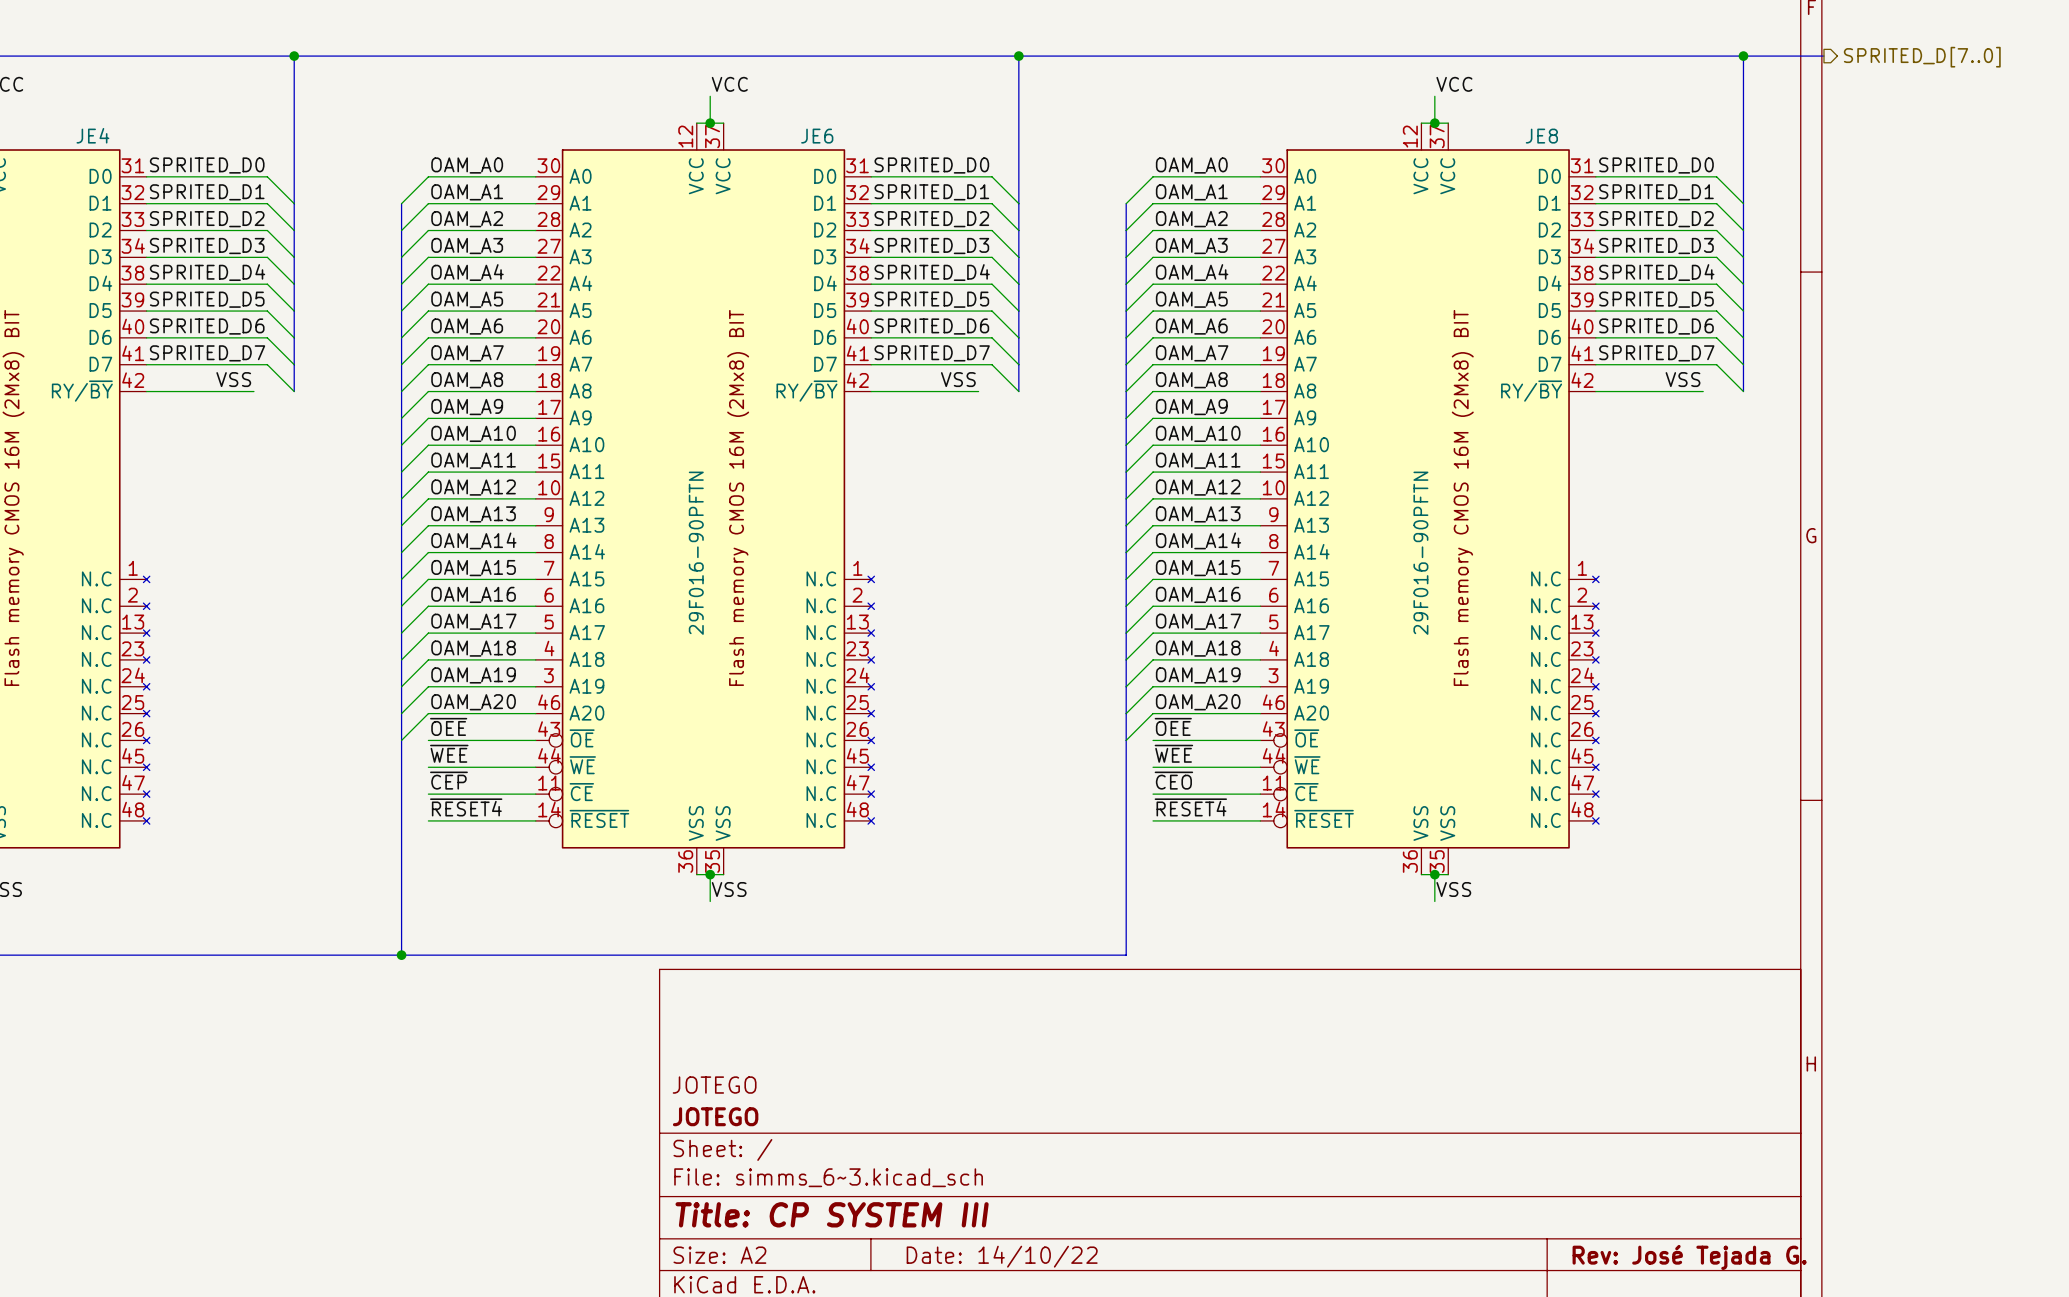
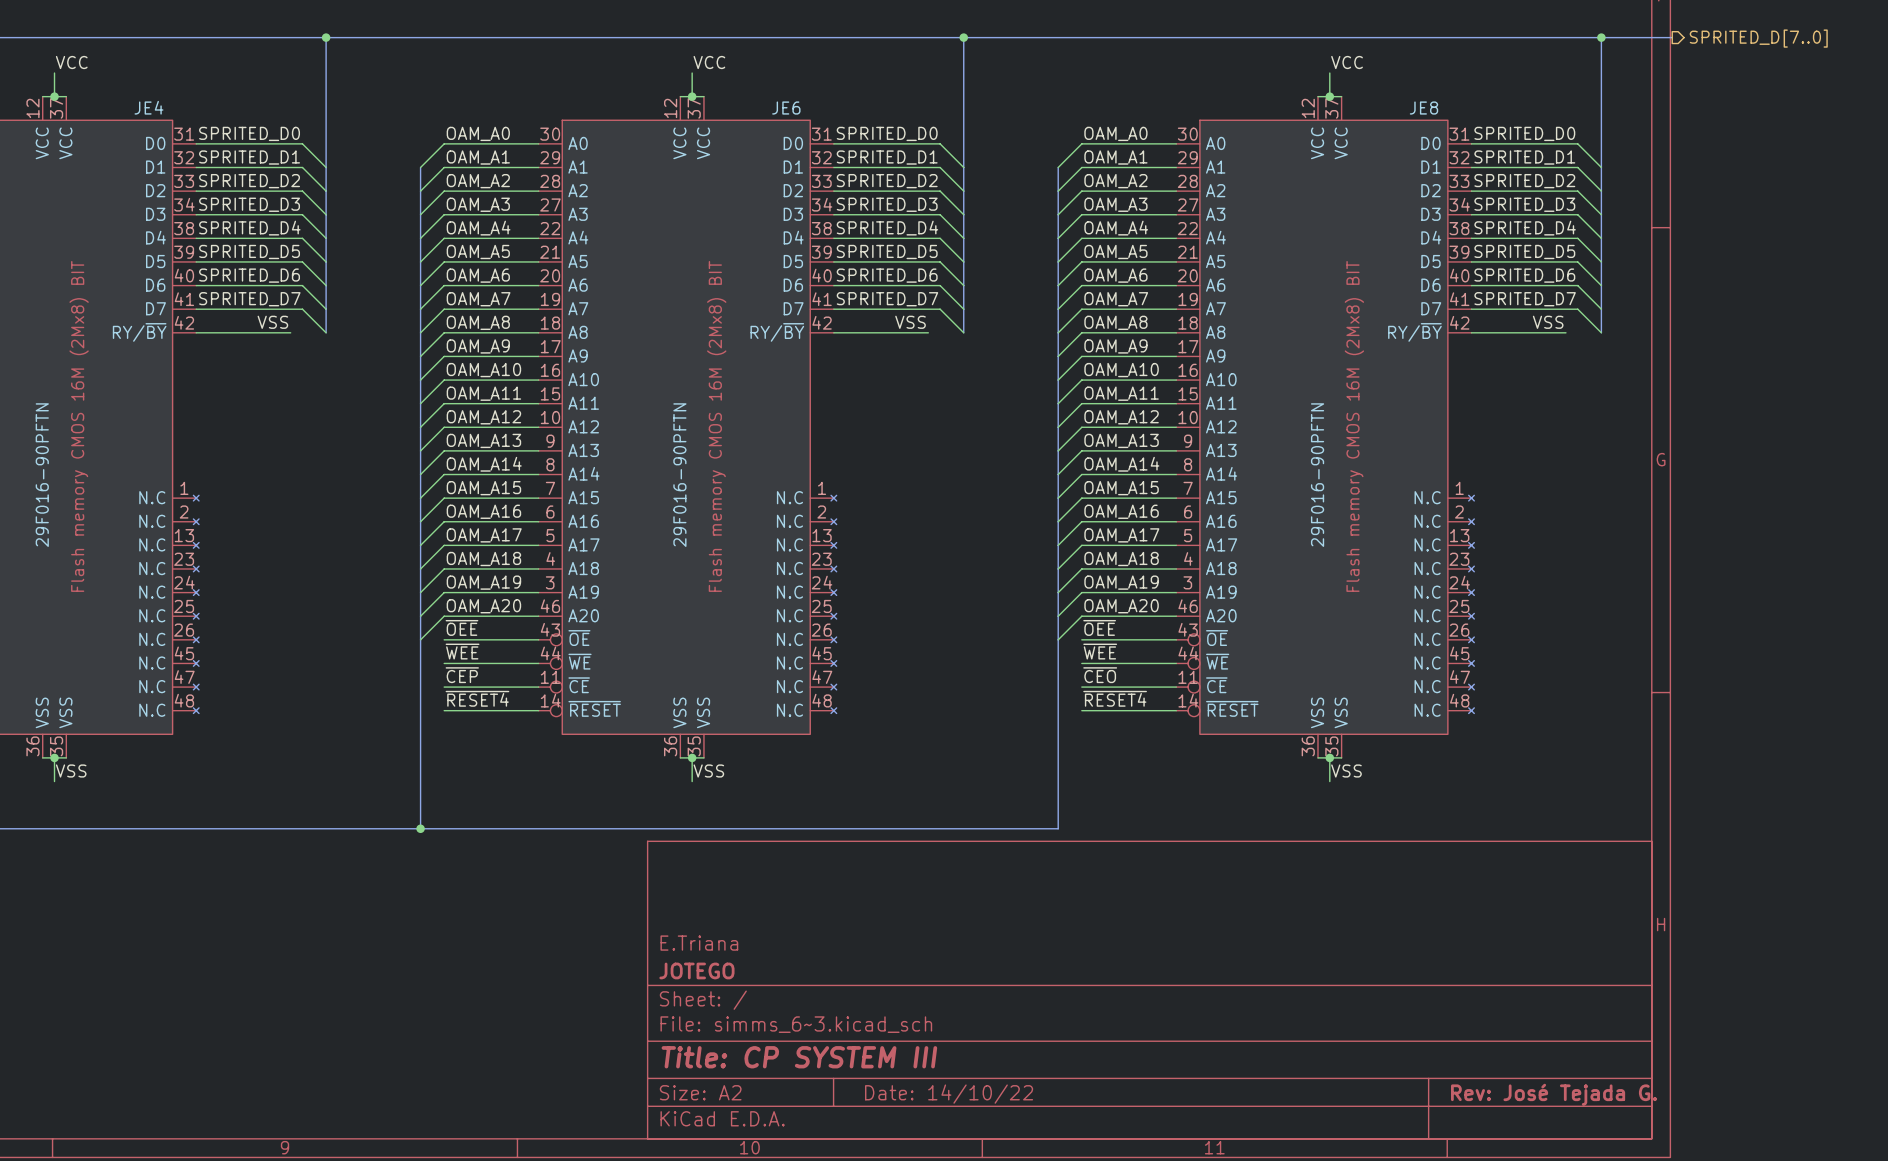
title block: JOTEGO (714, 1085) -> E.Triana (699, 943)

